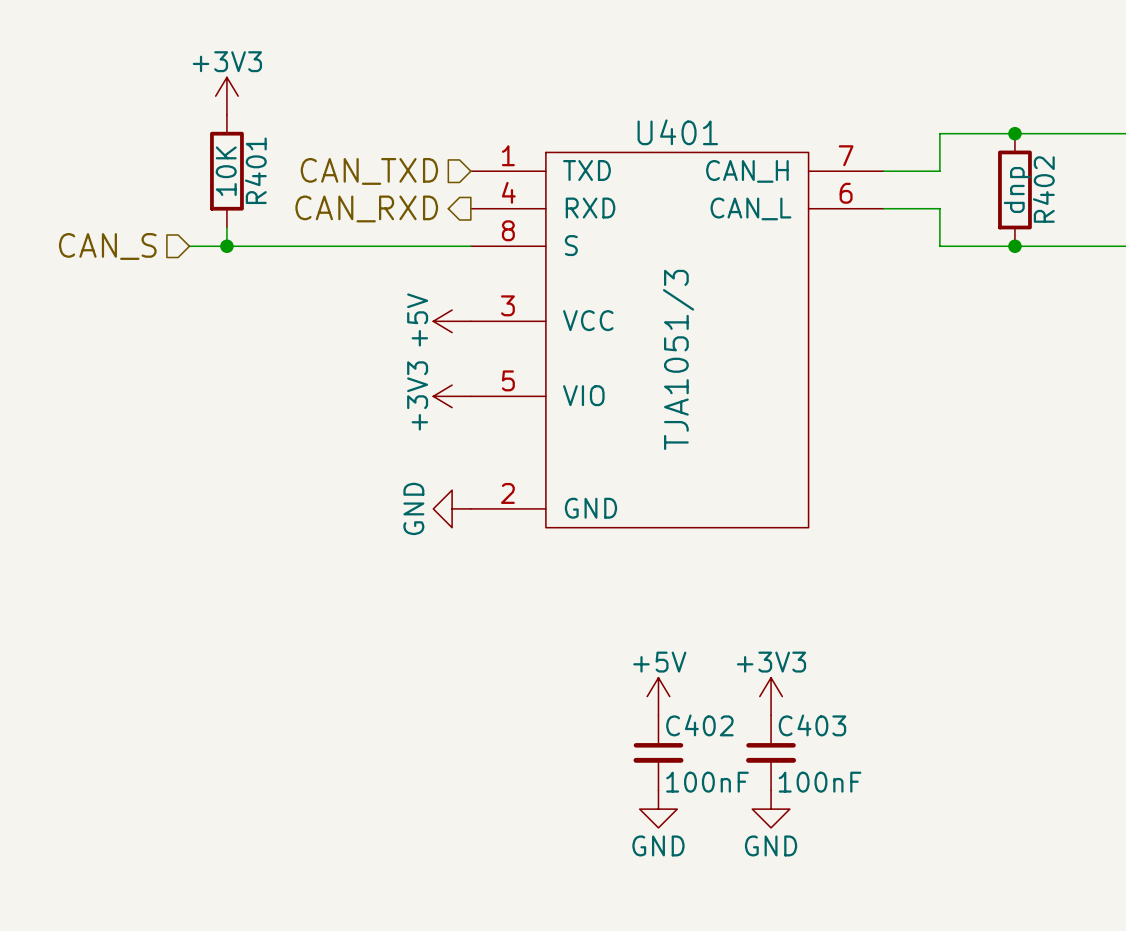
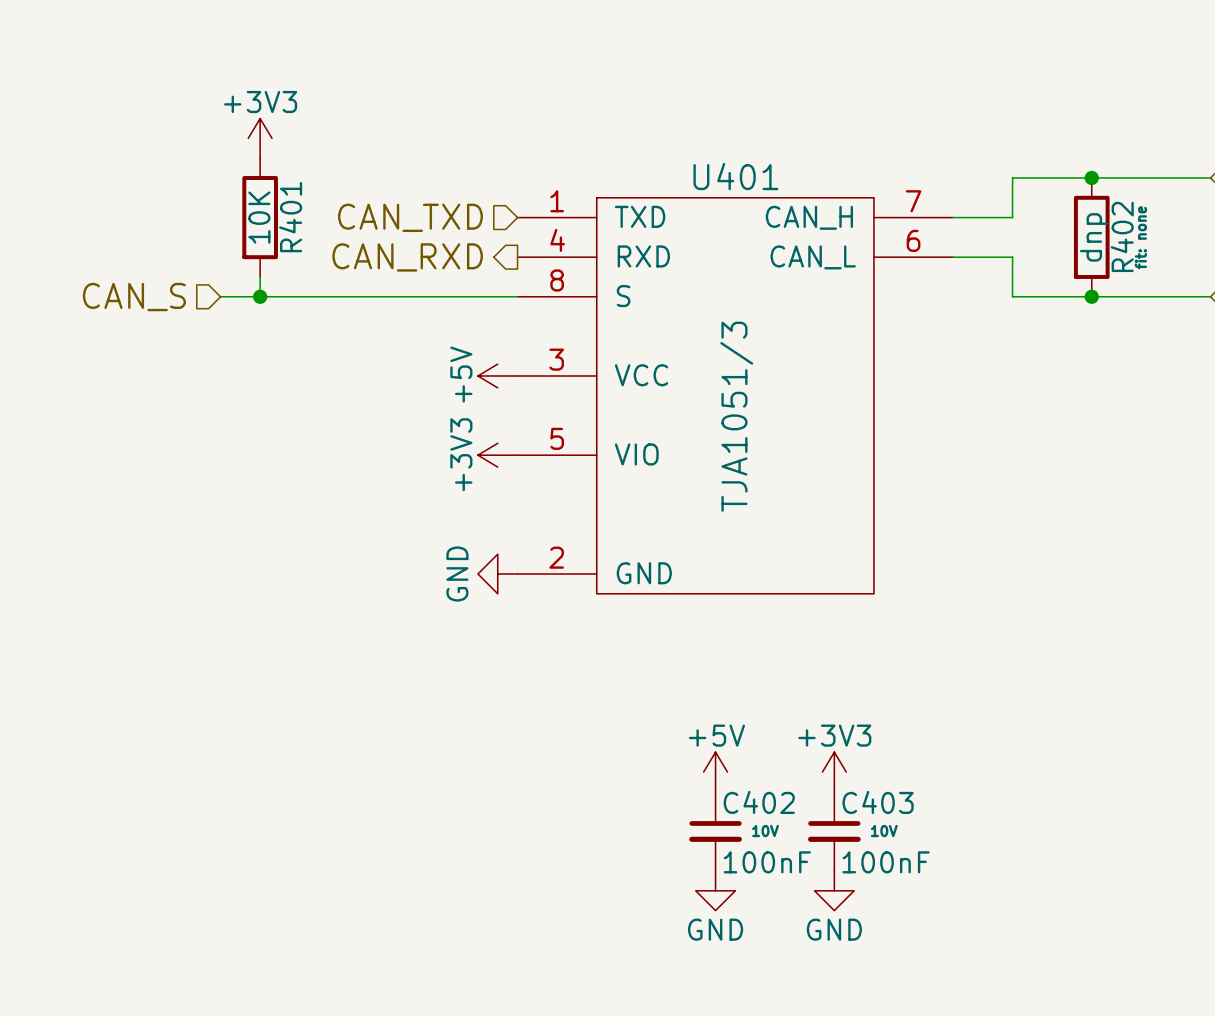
R402 text: none -> fit: none (1140, 237)
C402 text: none -> 10V (765, 831)
C403 text: none -> 10V (884, 831)

